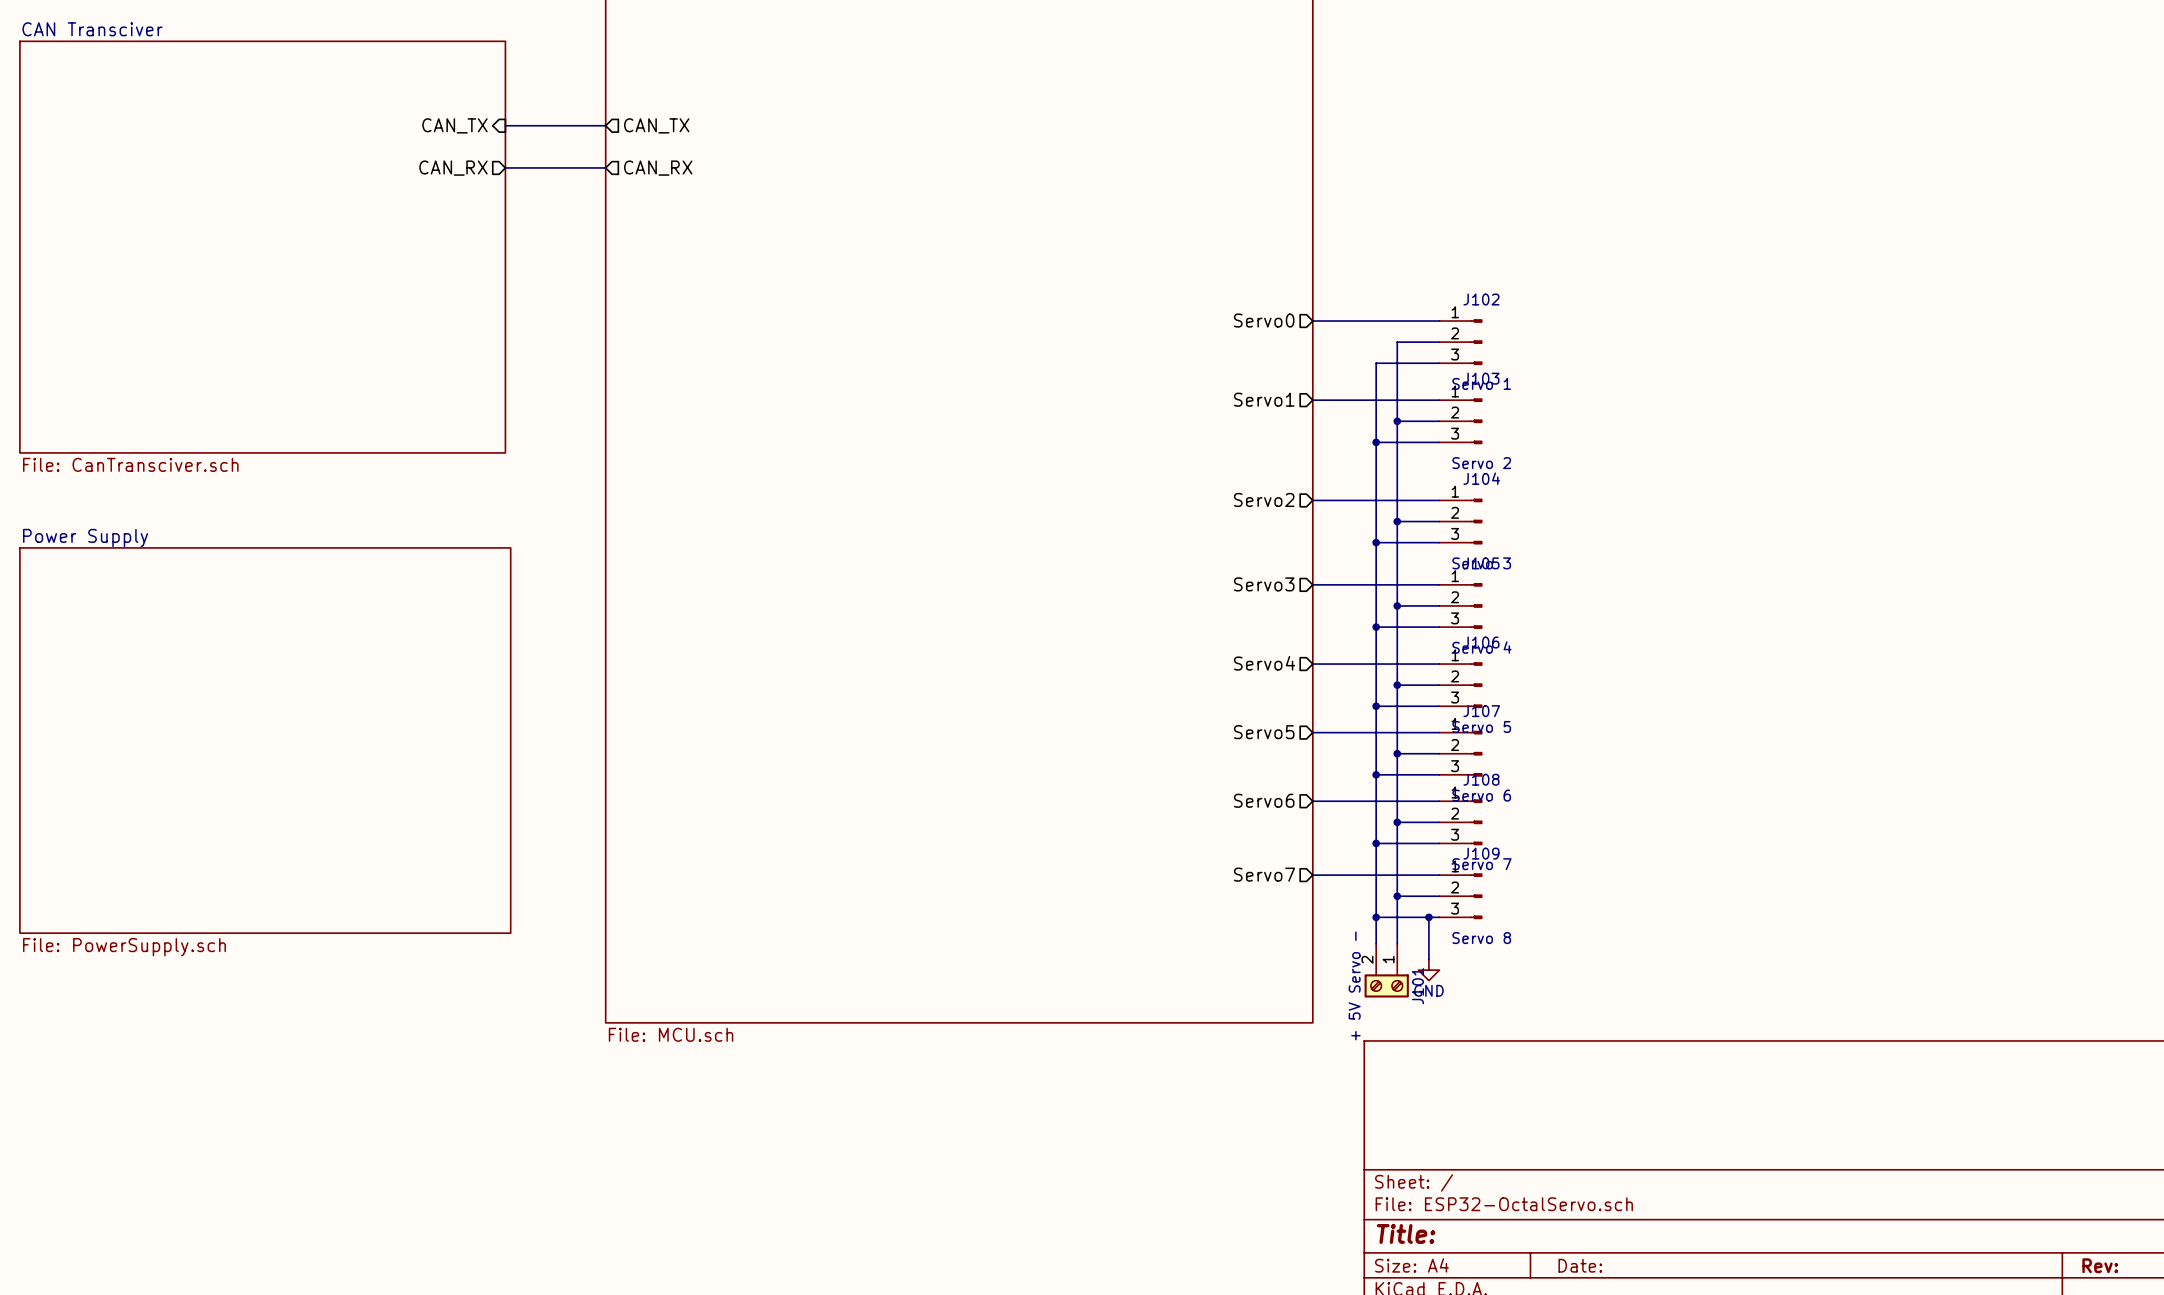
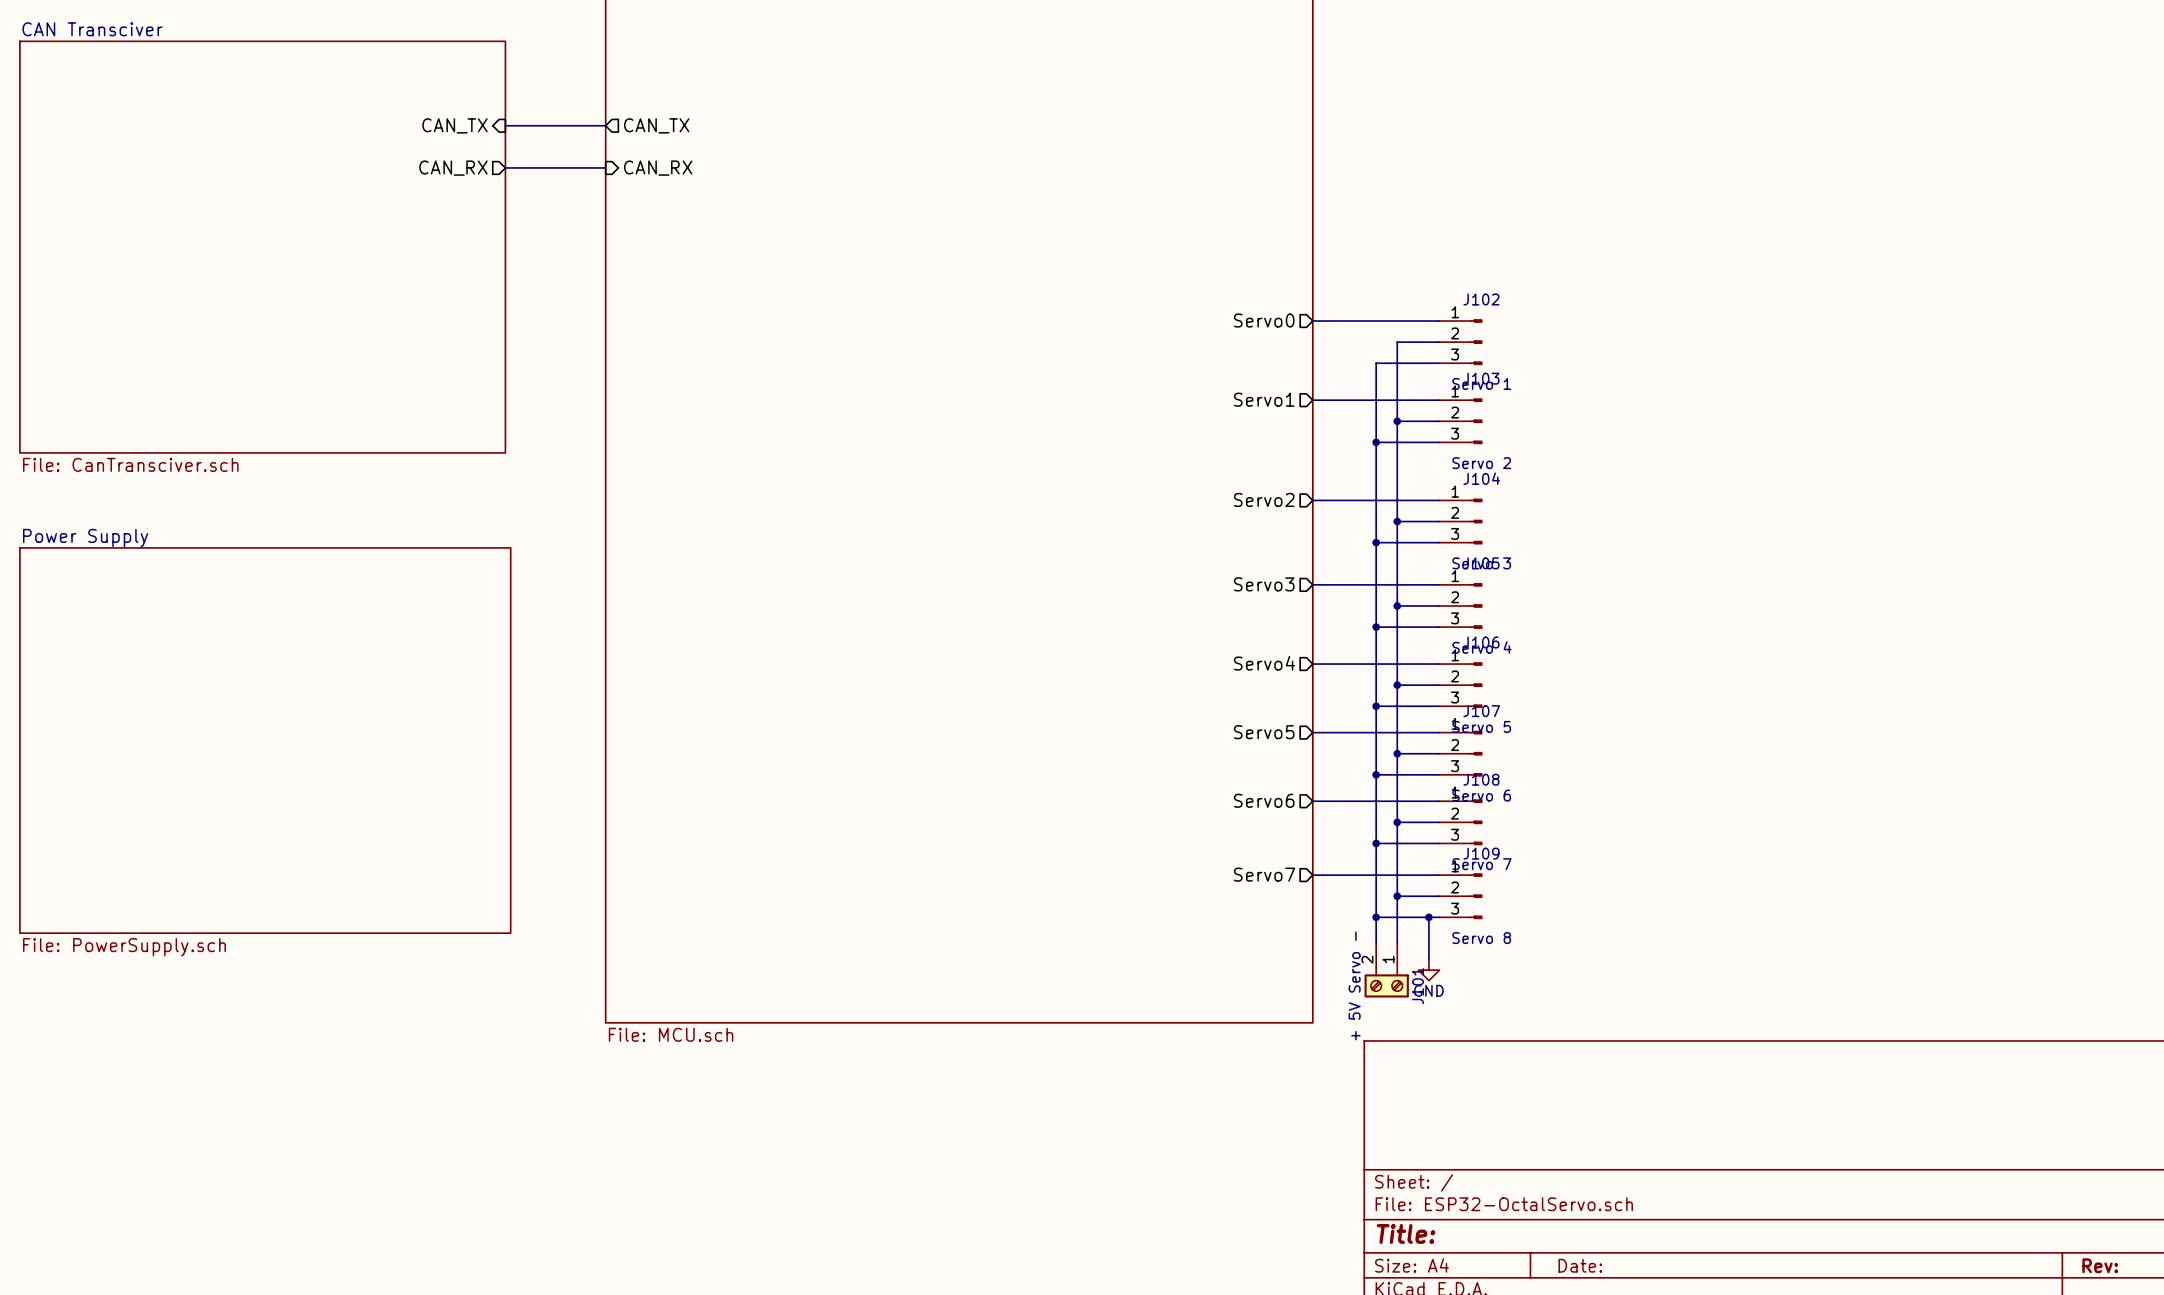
sheet pin shape: output (658, 168) -> input (658, 168)

